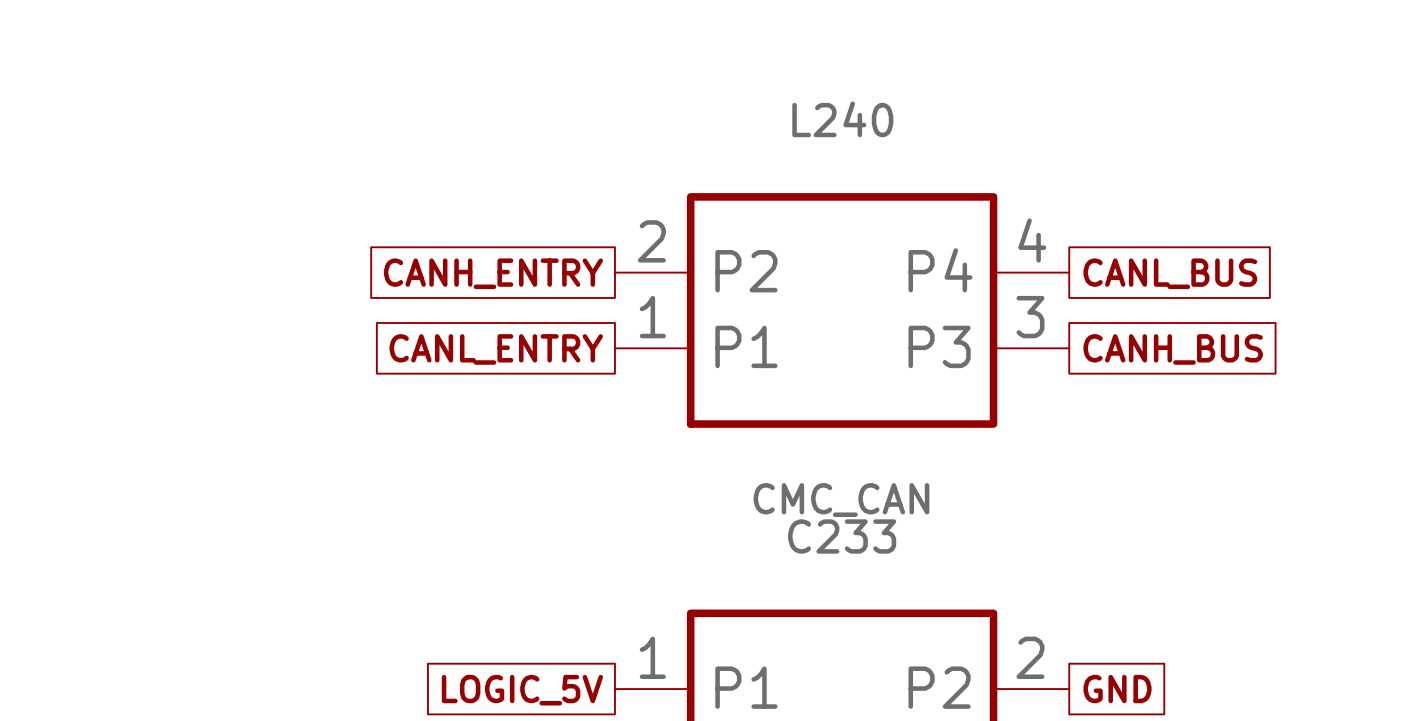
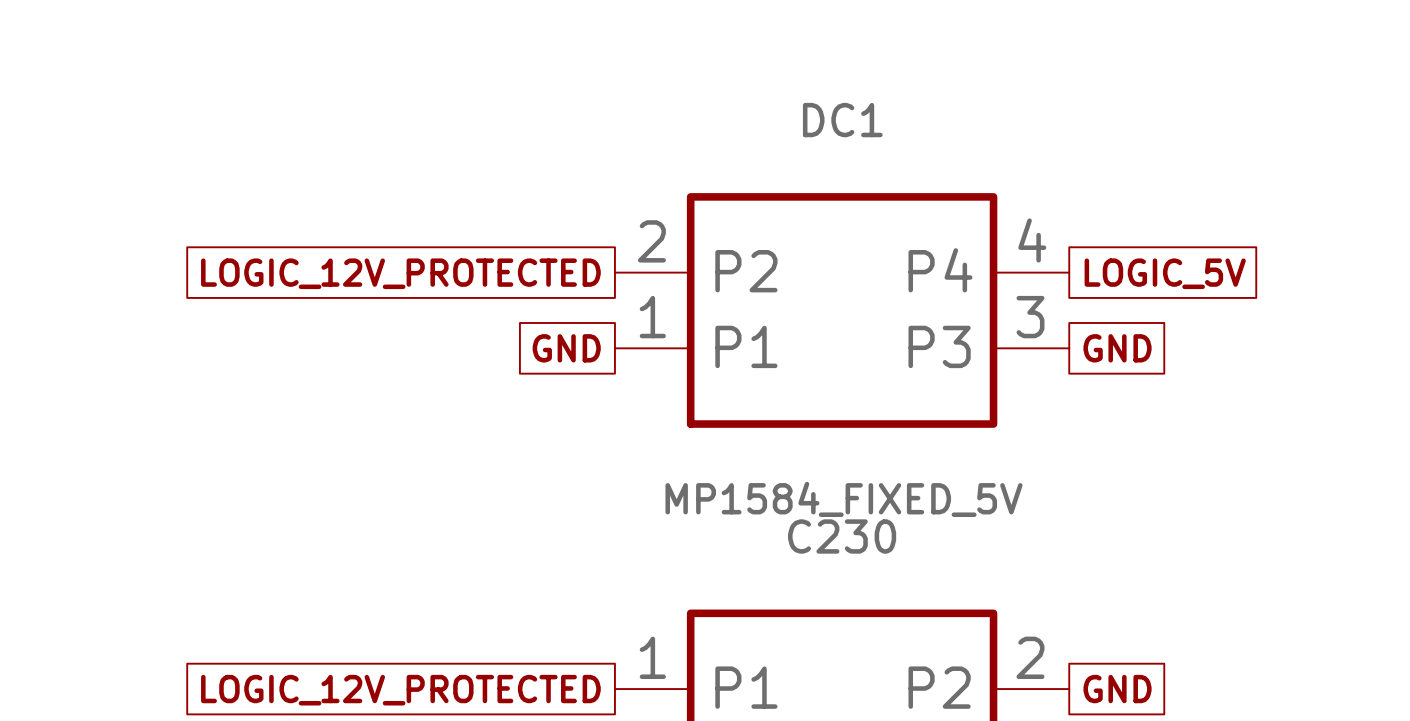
L240 name: L240 (842, 119) -> DC1 (842, 120)
global label: CANH_ENTRY (493, 273) -> LOGIC_12V_PROTECTED (400, 273)
global label: CANL_BUS (1170, 273) -> LOGIC_5V (1165, 273)
global label: CANL_ENTRY (496, 349) -> GND (566, 348)
global label: CANH_BUS (1173, 349) -> GND (1117, 348)
L240 value: CMC_CAN (841, 500) -> MP1584_FIXED_5V (844, 499)
C233 name: C233 (842, 536) -> C230 (842, 536)
global label: LOGIC_5V (522, 690) -> LOGIC_12V_PROTECTED (400, 690)

